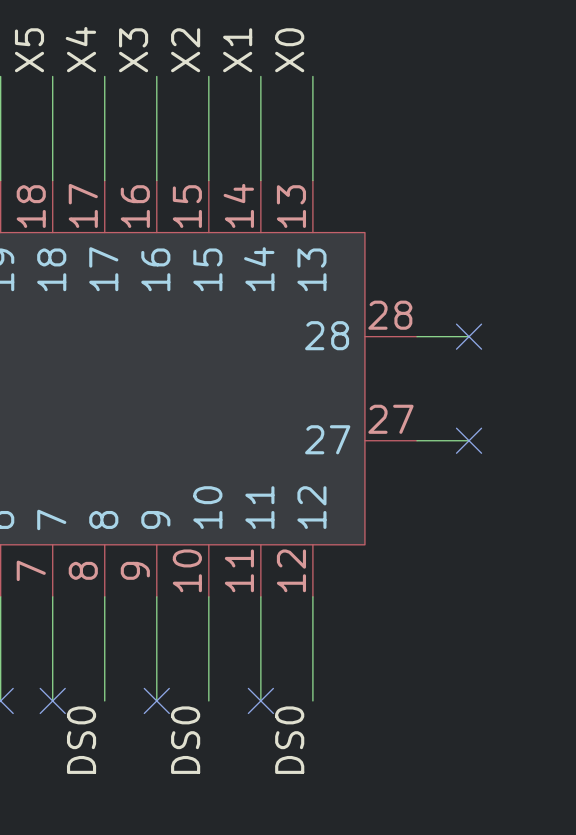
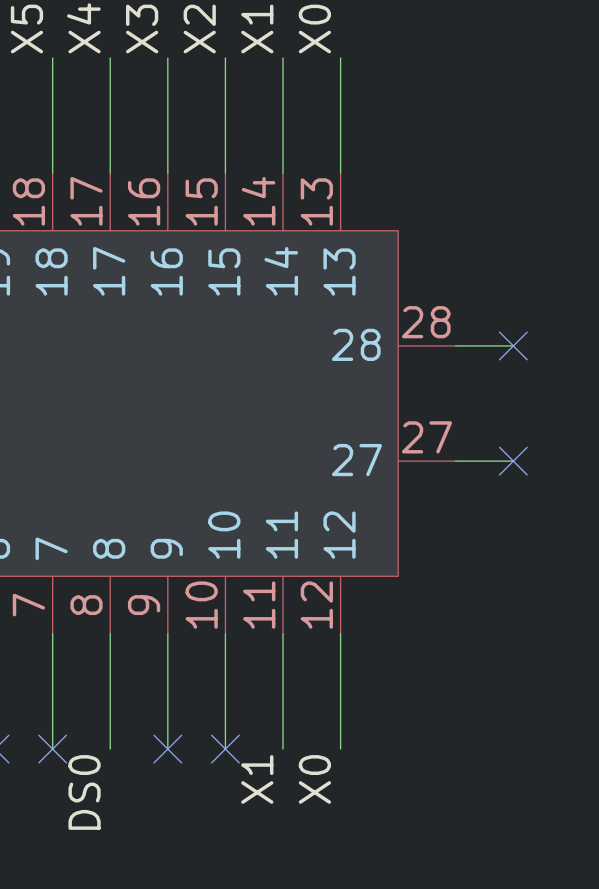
no-connect mark position: (260, 700) -> (225, 749)
label: none -> X1 (257, 779)
label: DS0 (185, 740) -> none
label: DS0 (289, 740) -> X0 (314, 779)

